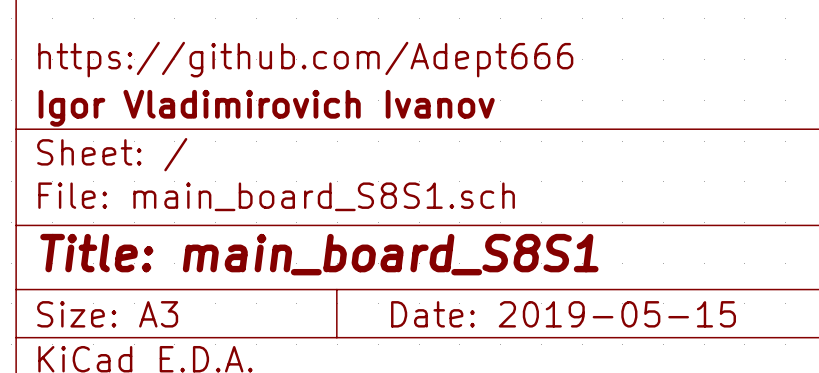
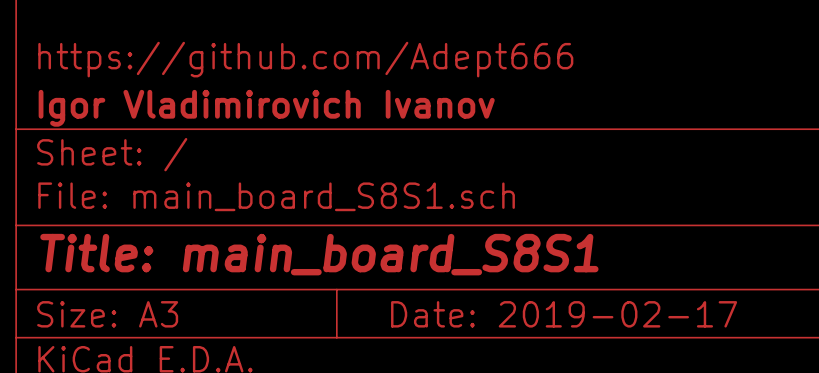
title block: Date: 2019-05-15 (563, 314) -> Date: 2019-02-17 (564, 314)

